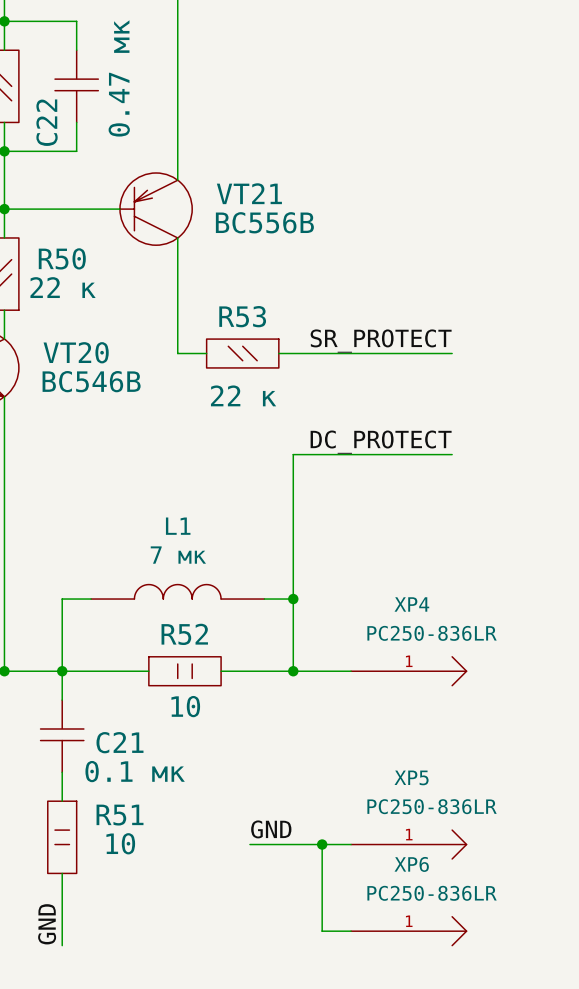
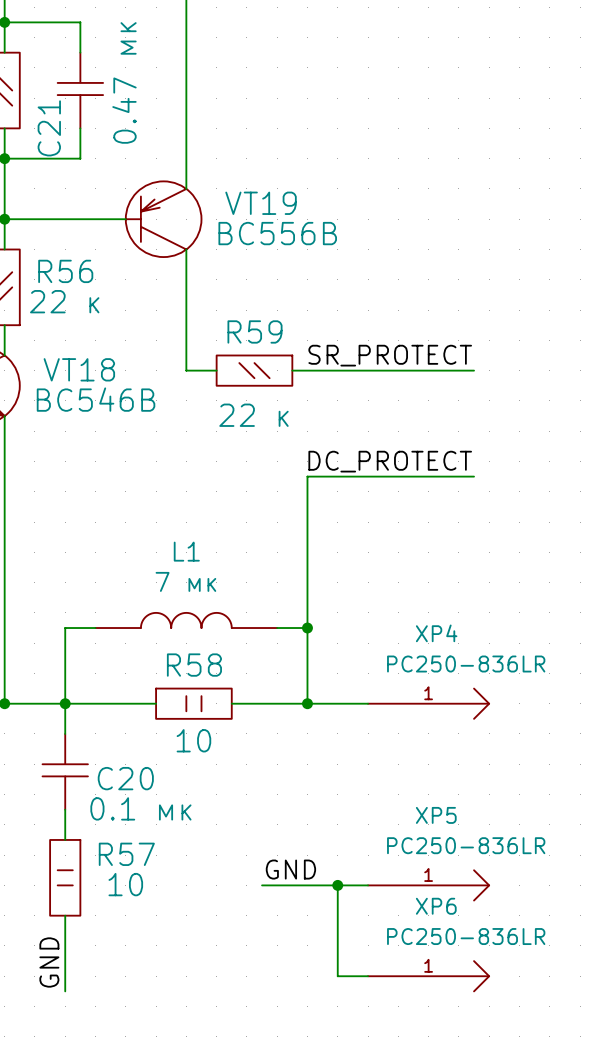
C22 name: C22 (47, 122) -> C21 (49, 128)
VT21 name: VT21 (249, 193) -> VT19 (261, 203)
R50 name: R50 (62, 258) -> R56 (65, 271)
R53 name: R53 (242, 316) -> R59 (255, 331)
VT20 name: VT20 (76, 352) -> VT18 (79, 369)
R52 name: R52 (184, 634) -> R58 (194, 665)
C21 name: C21 (119, 742) -> C20 (125, 778)
R51 name: R51 (120, 815) -> R57 (126, 854)

